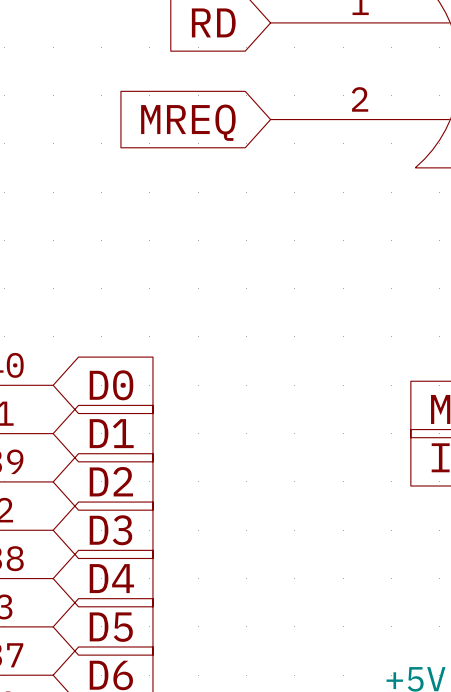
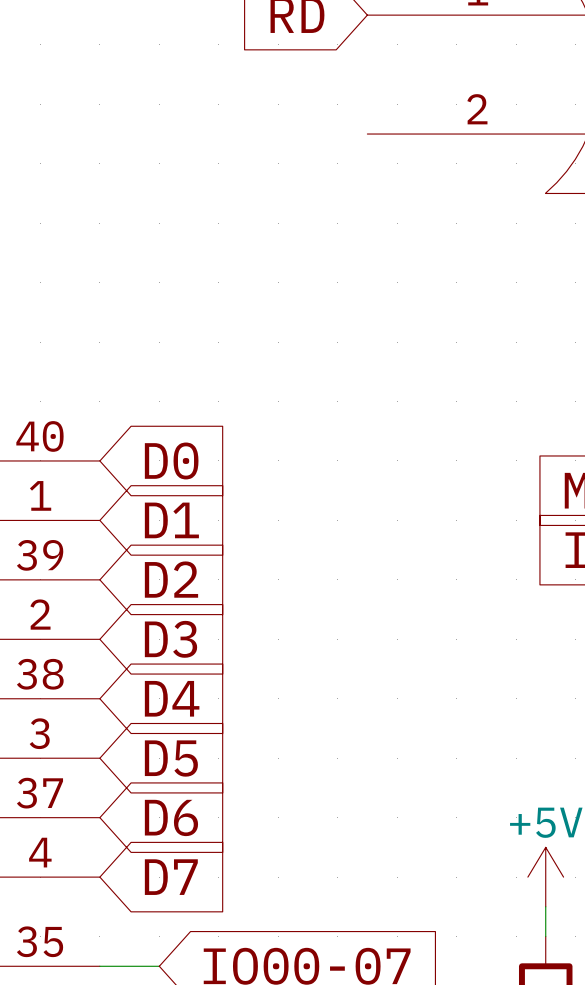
global label: MREQ (188, 122) -> none

